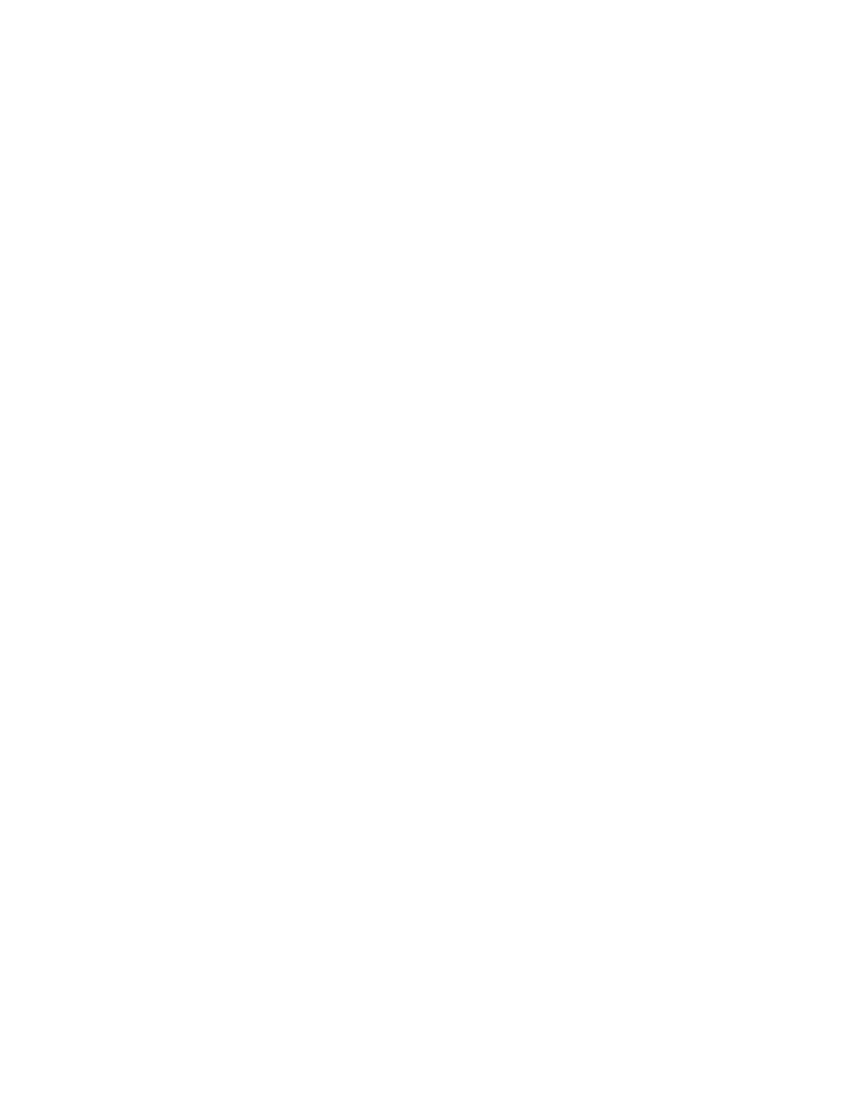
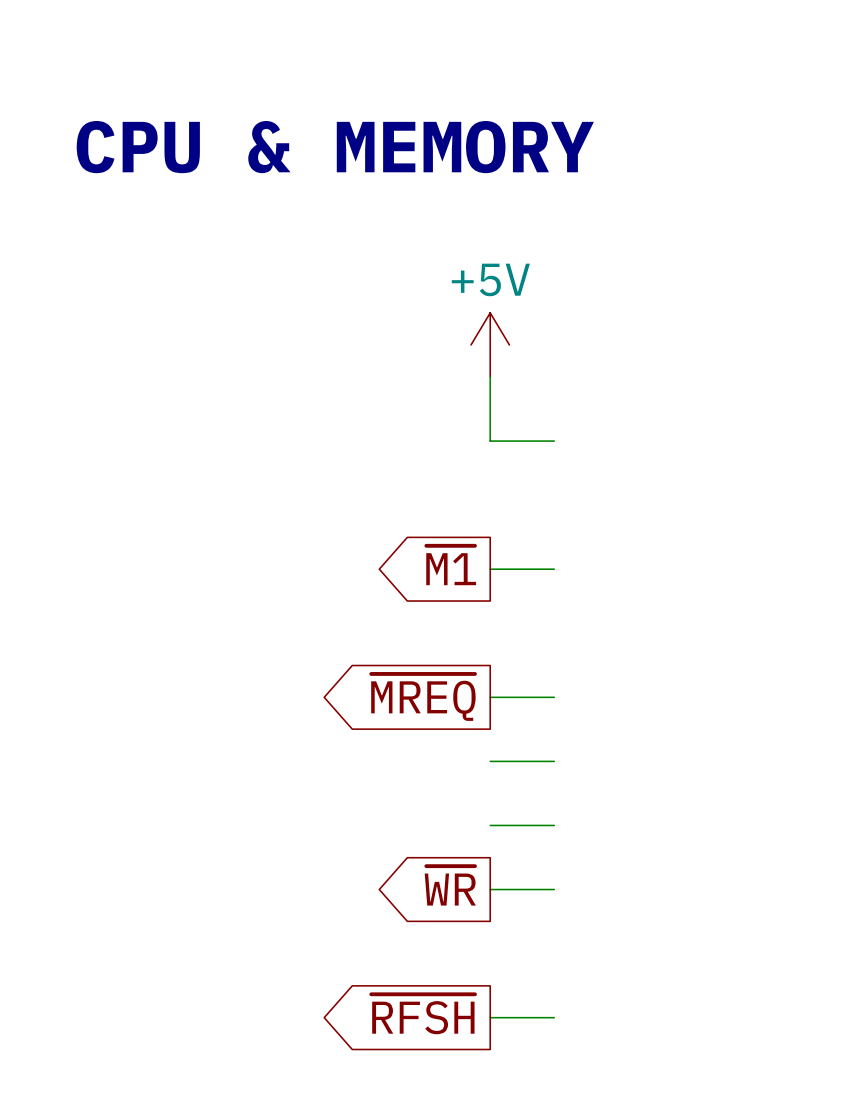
text: none -> CPU & MEMORY (335, 147)
power symbol: none -> +5V (490, 344)
wire: none -> (490, 376) (490, 441) (554, 441)
global label: none -> ~{M1} (451, 565)
wire: none -> (490, 569) (554, 569)
global label: none -> ~{MREQ} (423, 697)
wire: none -> (490, 697) (554, 697)
wire: none -> (490, 761) (554, 761)
wire: none -> (490, 825) (554, 825)
global label: none -> ~{WR} (450, 885)
wire: none -> (490, 889) (554, 889)
global label: none -> ~{RFSH} (423, 1014)
wire: none -> (490, 1017) (554, 1017)

